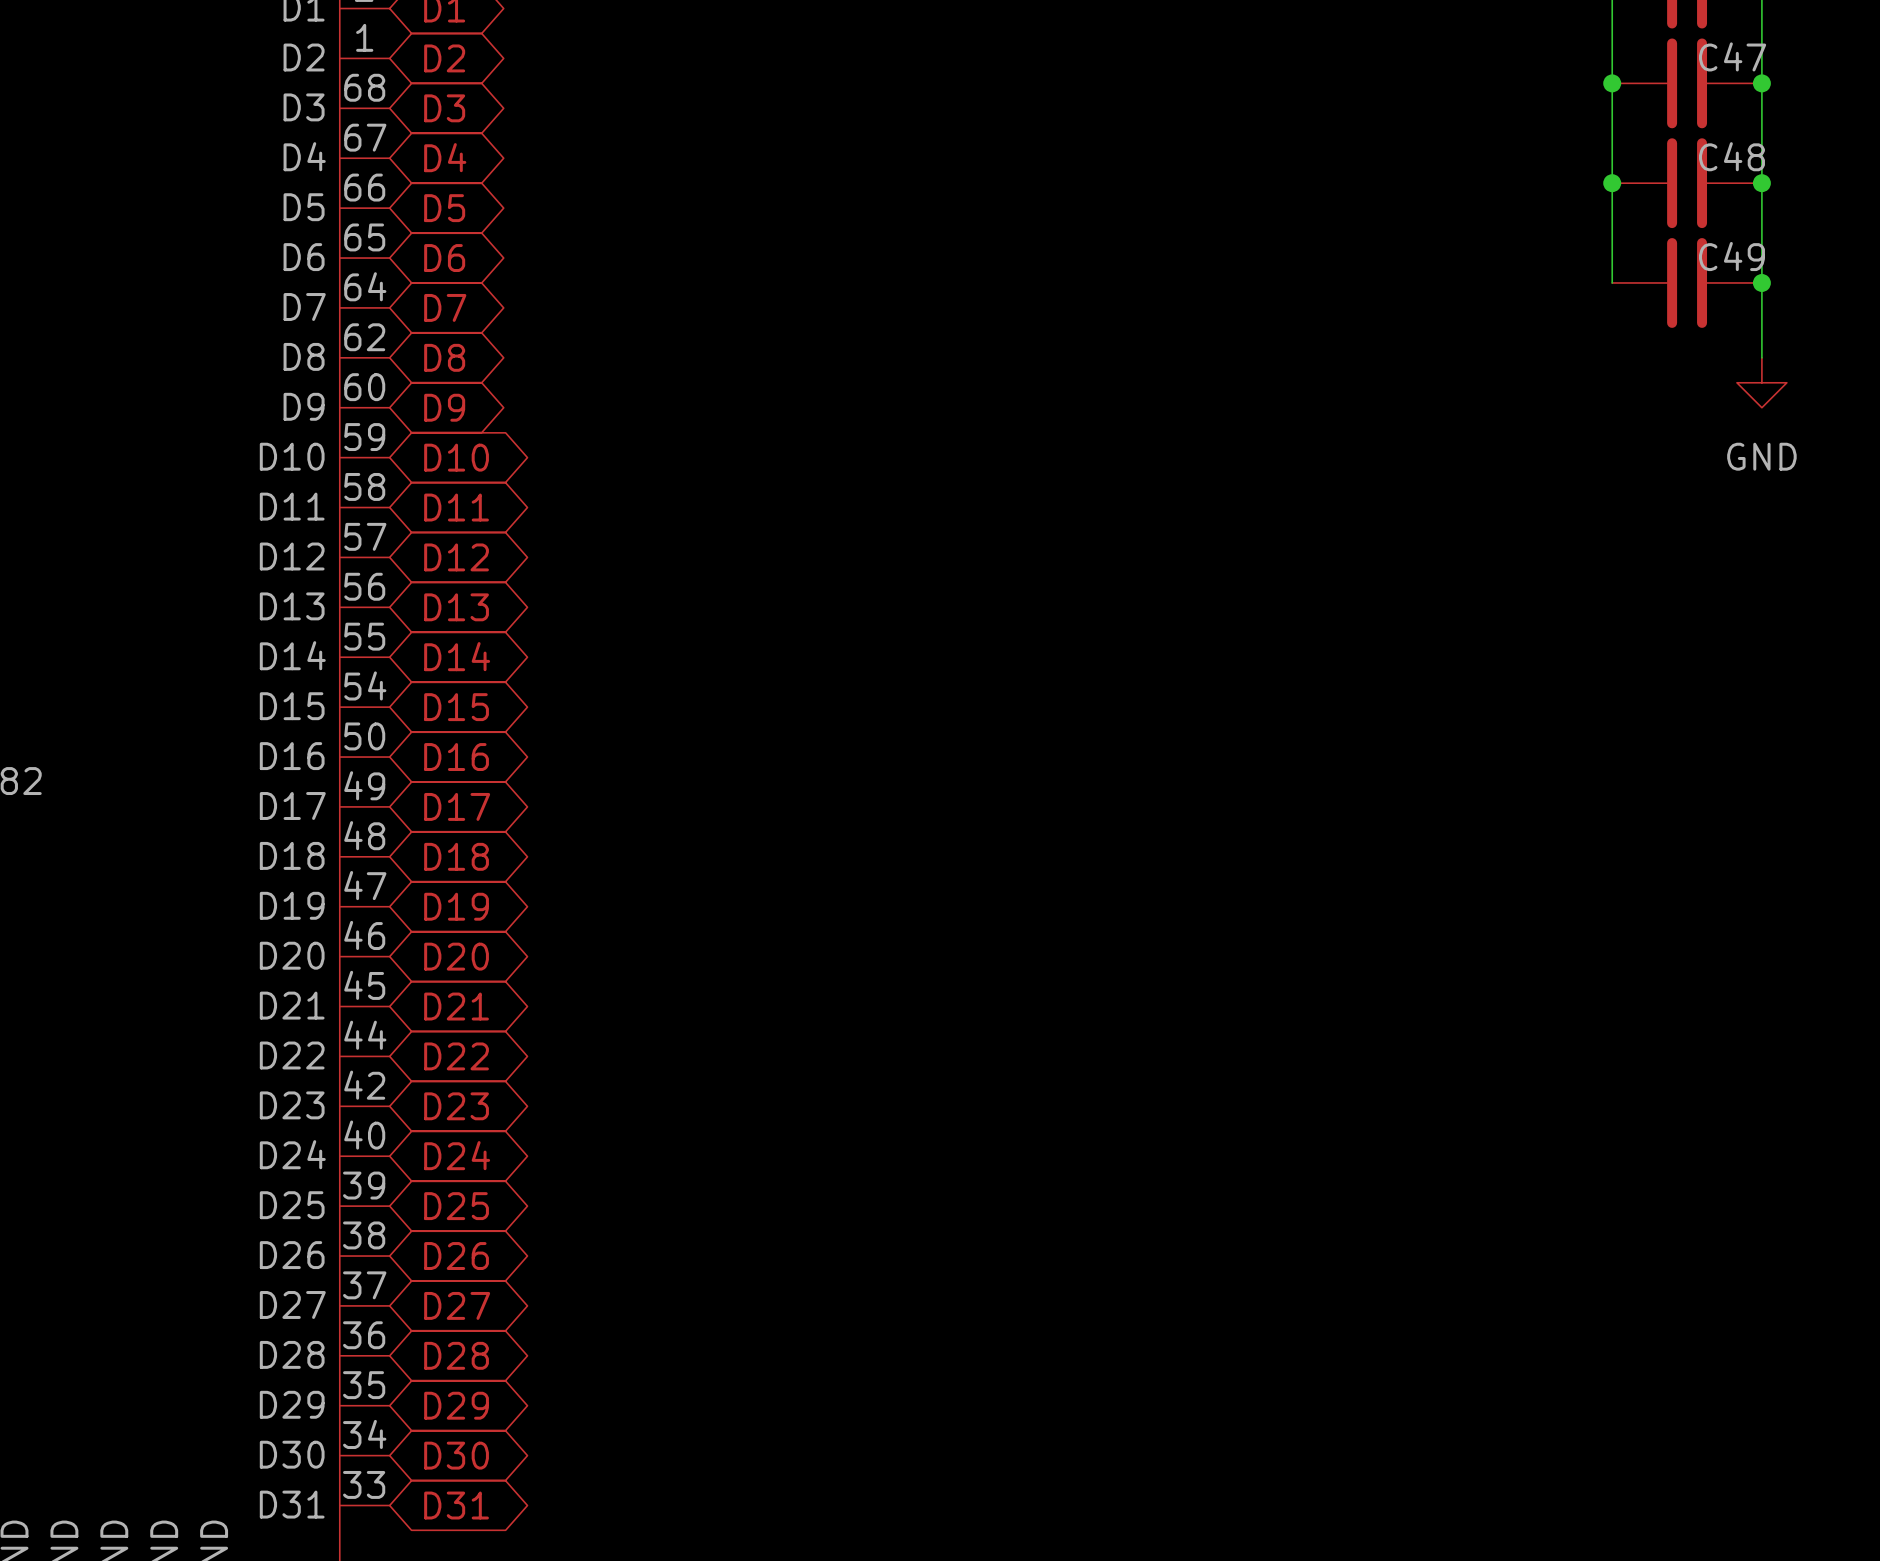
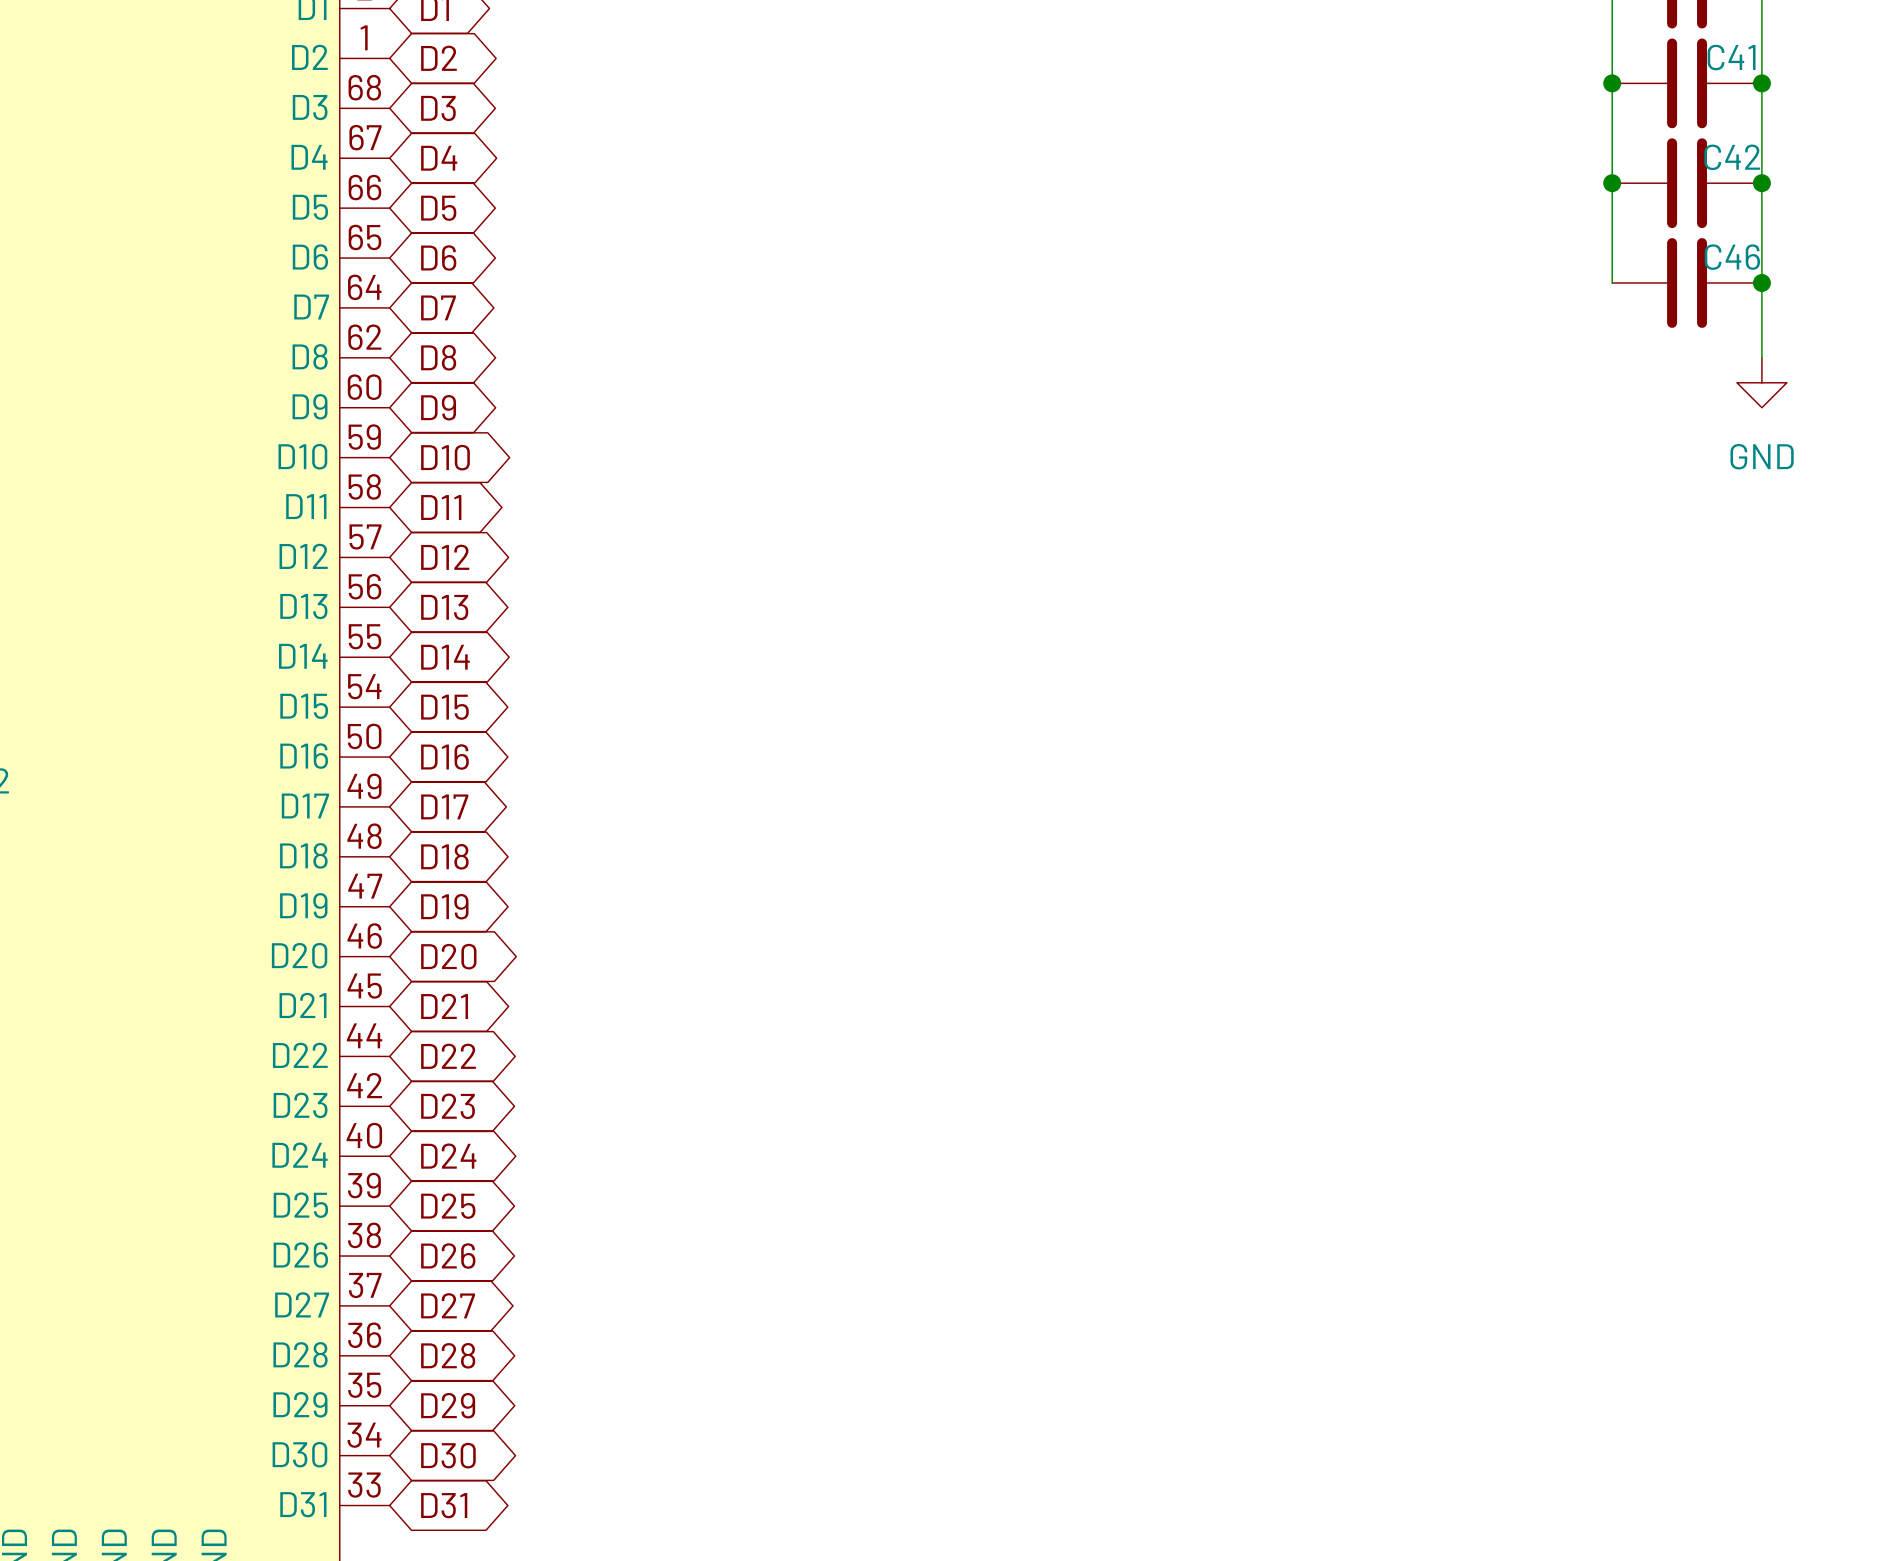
C47 name: C47 (1732, 56) -> C41 (1731, 57)
C48 name: C48 (1731, 156) -> C42 (1732, 157)
C49 name: C49 (1731, 256) -> C46 (1732, 257)

